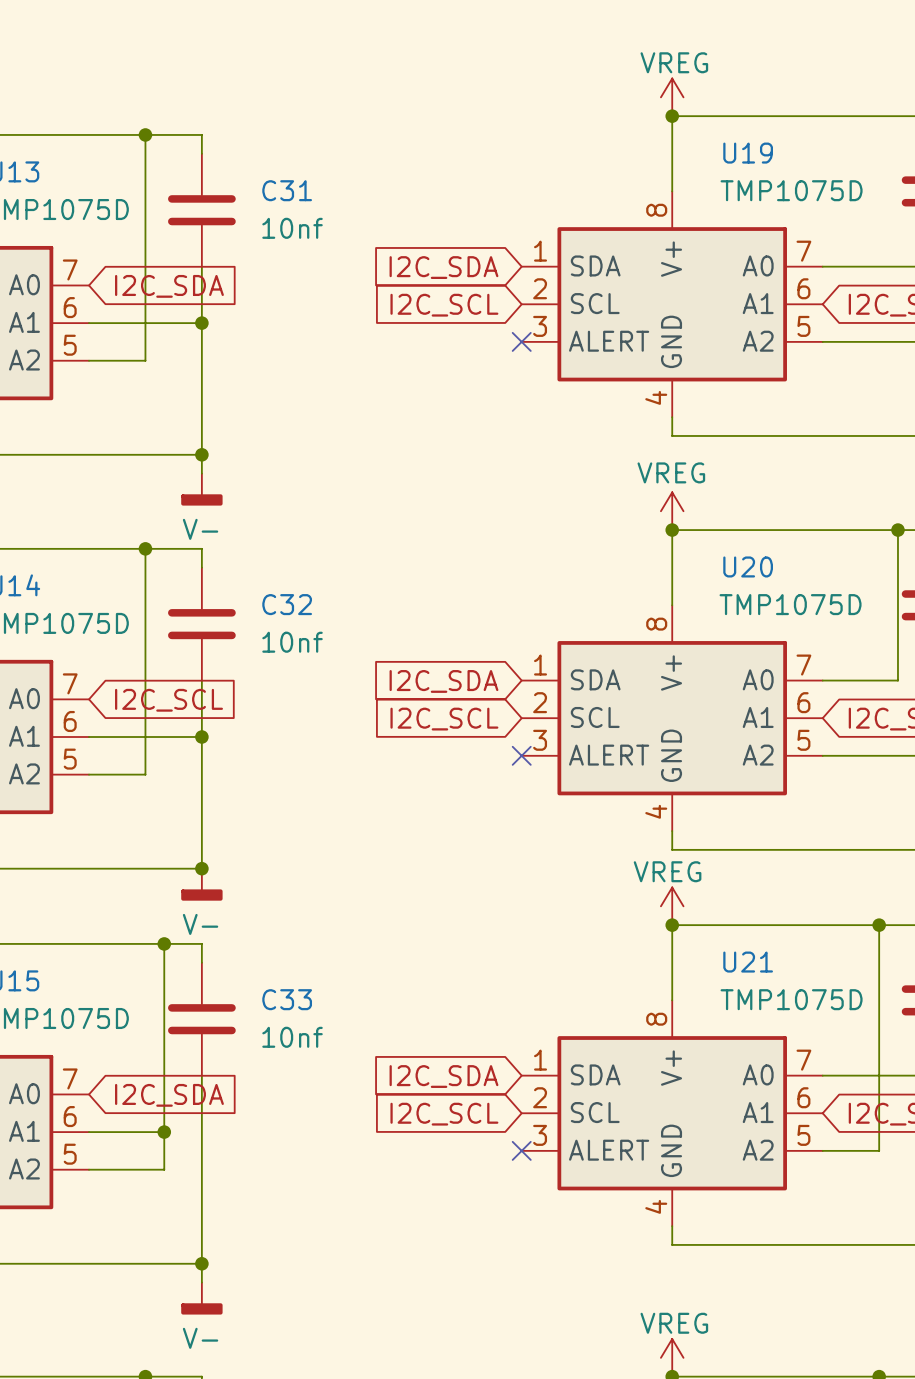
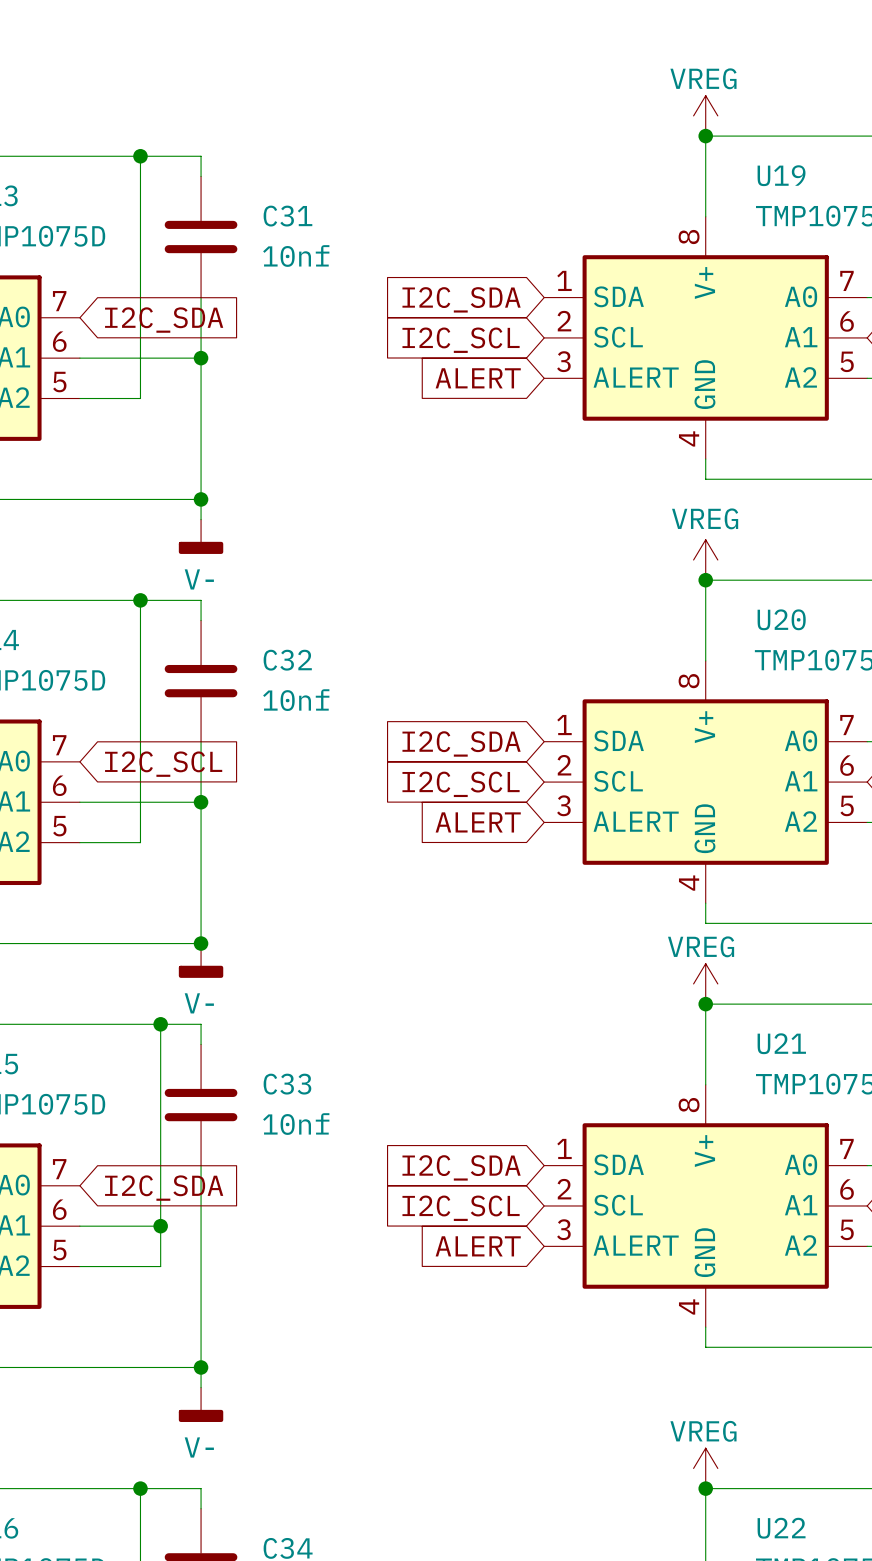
global label: none -> ALERT (478, 378)
no-connect mark: (521, 341) -> none
global label: none -> ALERT (478, 822)
no-connect mark: (521, 755) -> none
global label: none -> ALERT (478, 1246)
no-connect mark: (521, 1150) -> none

